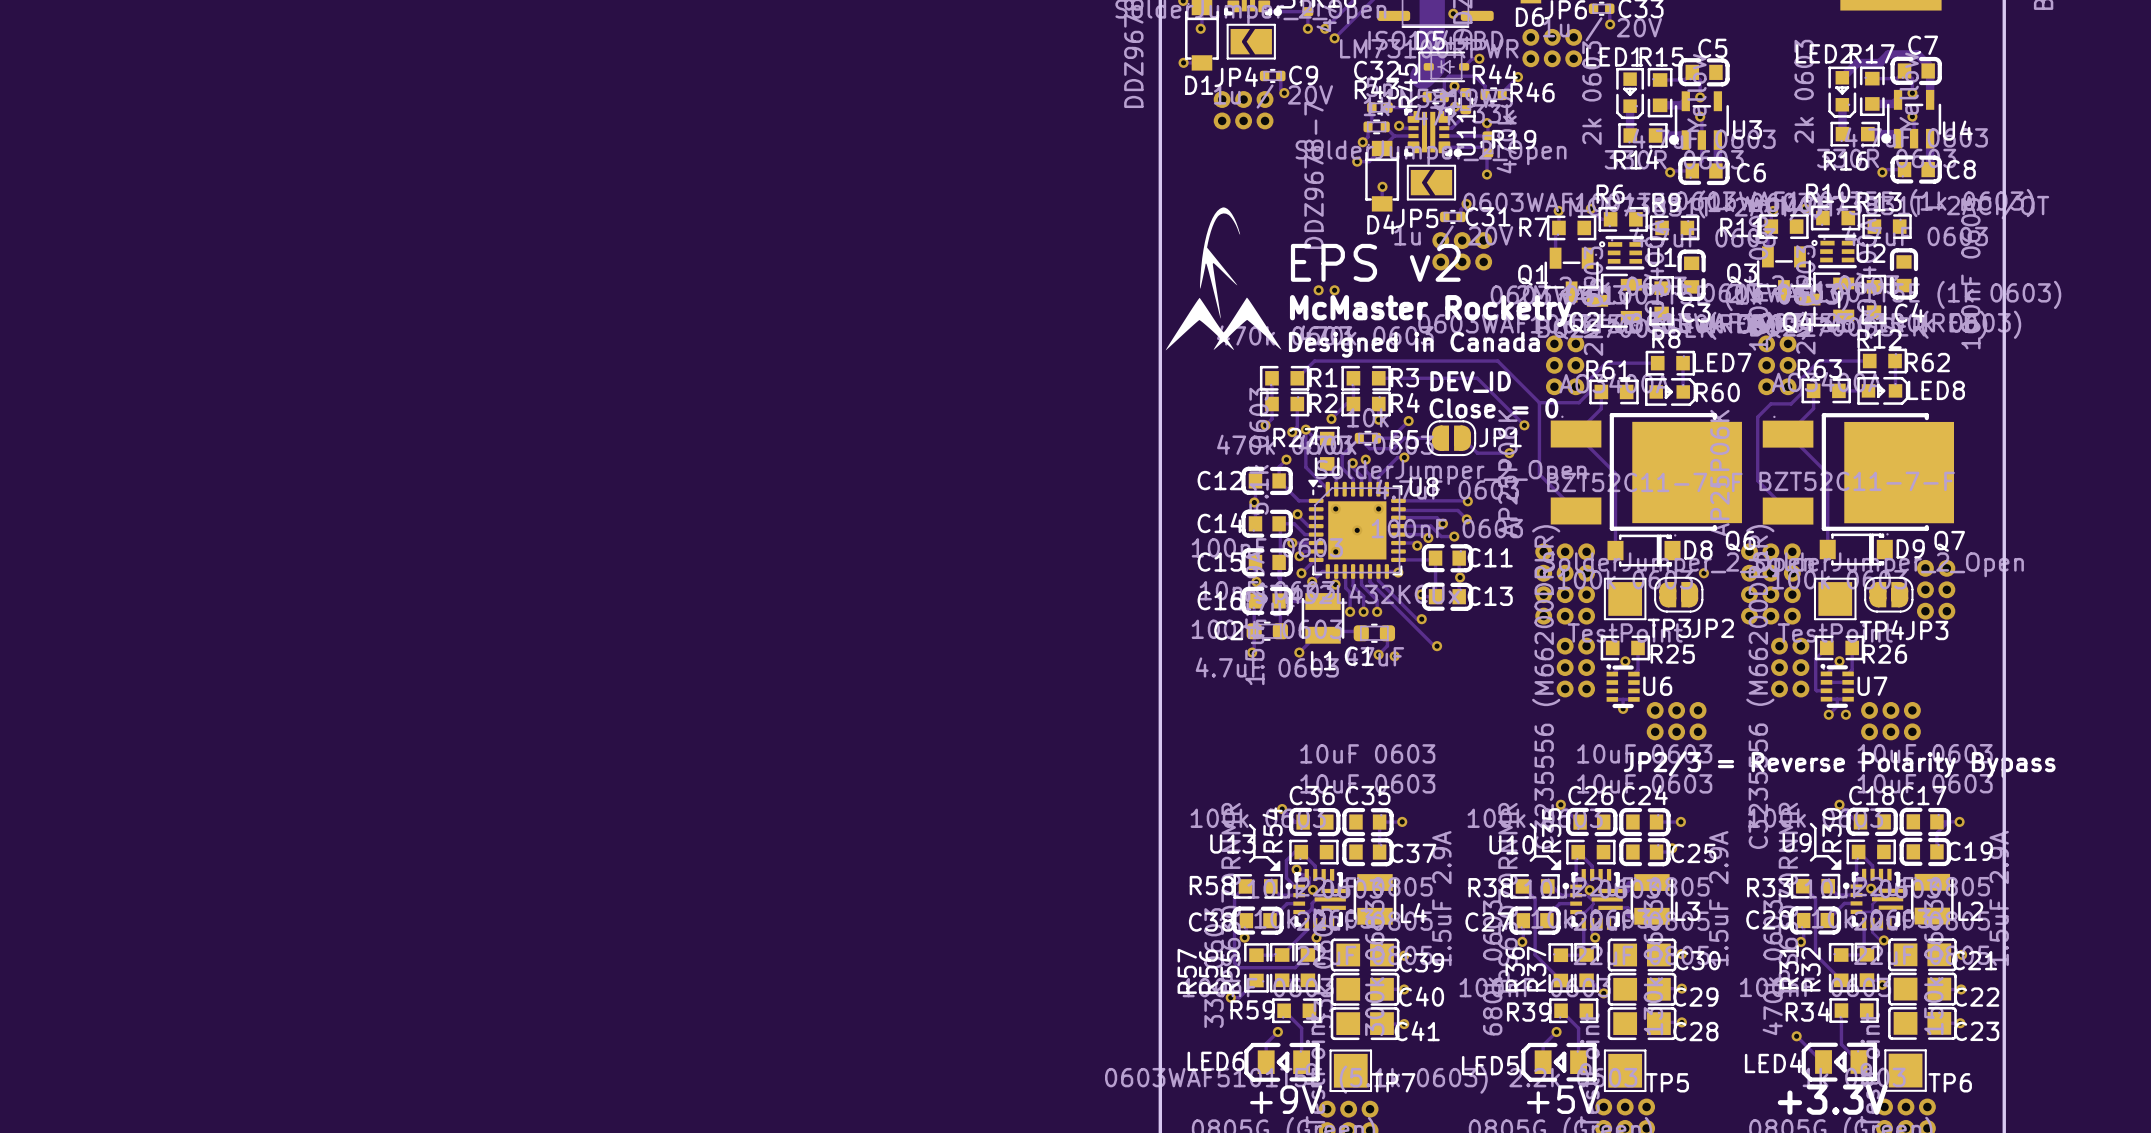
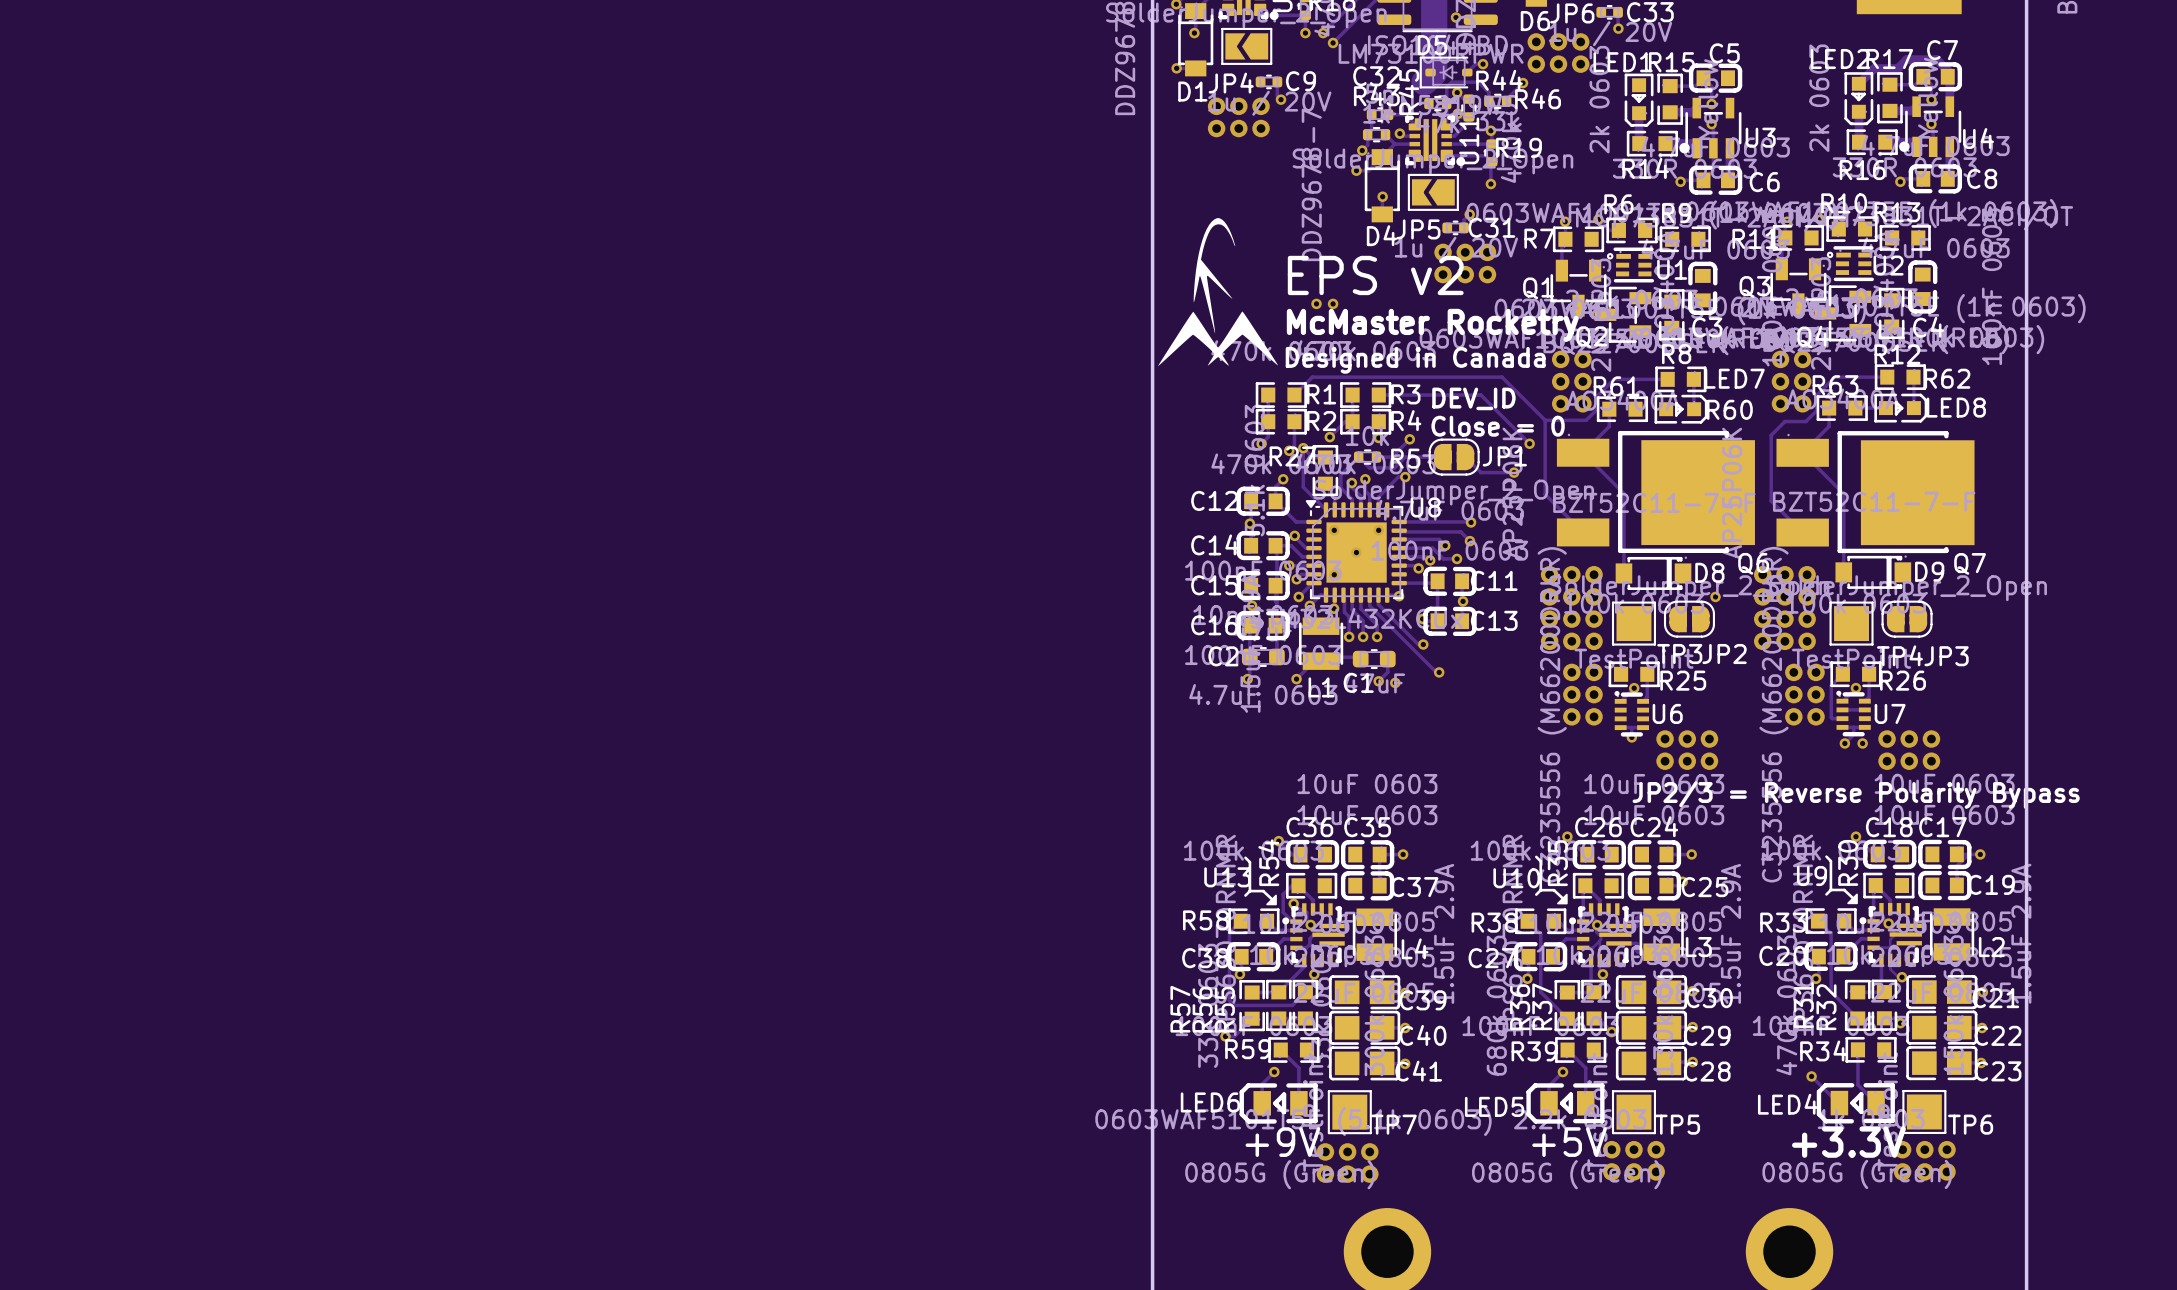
via: (1925, 568) -> none
via: (1946, 568) -> none
via: (1925, 589) -> none
via: (1946, 589) -> none
via: (1925, 611) -> none
via: (1946, 611) -> none

